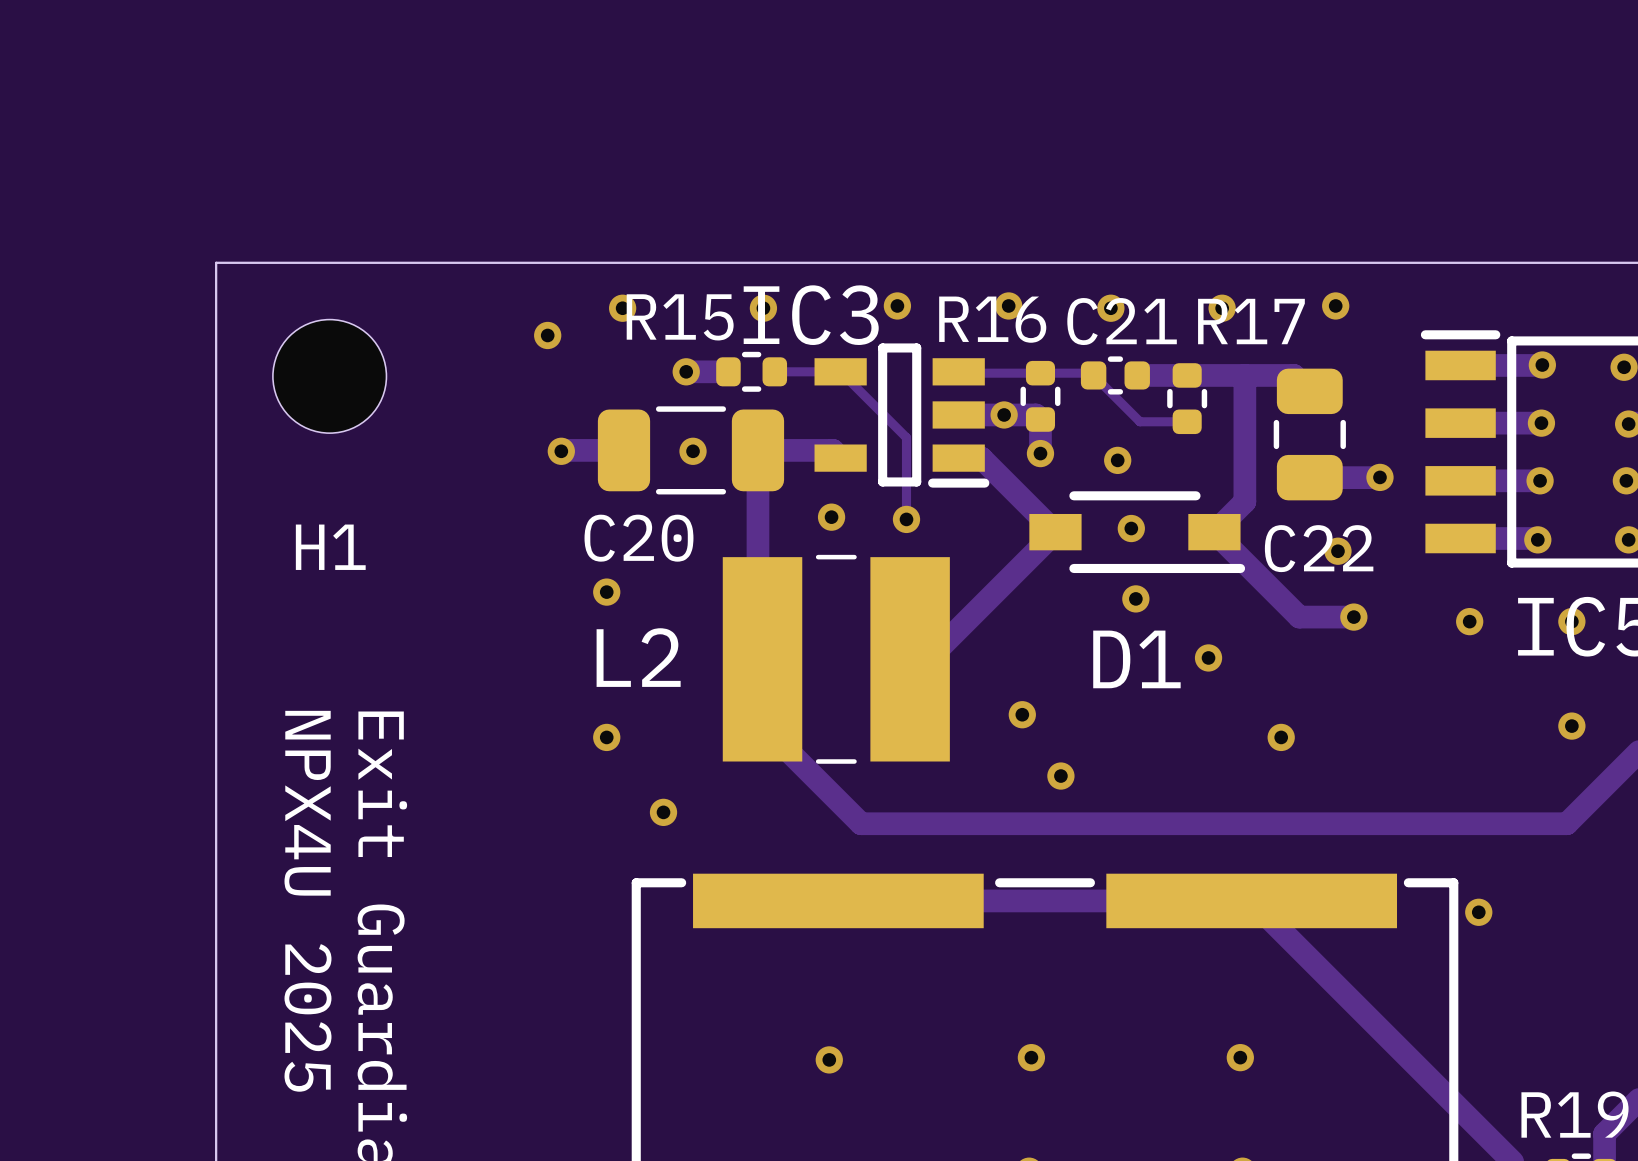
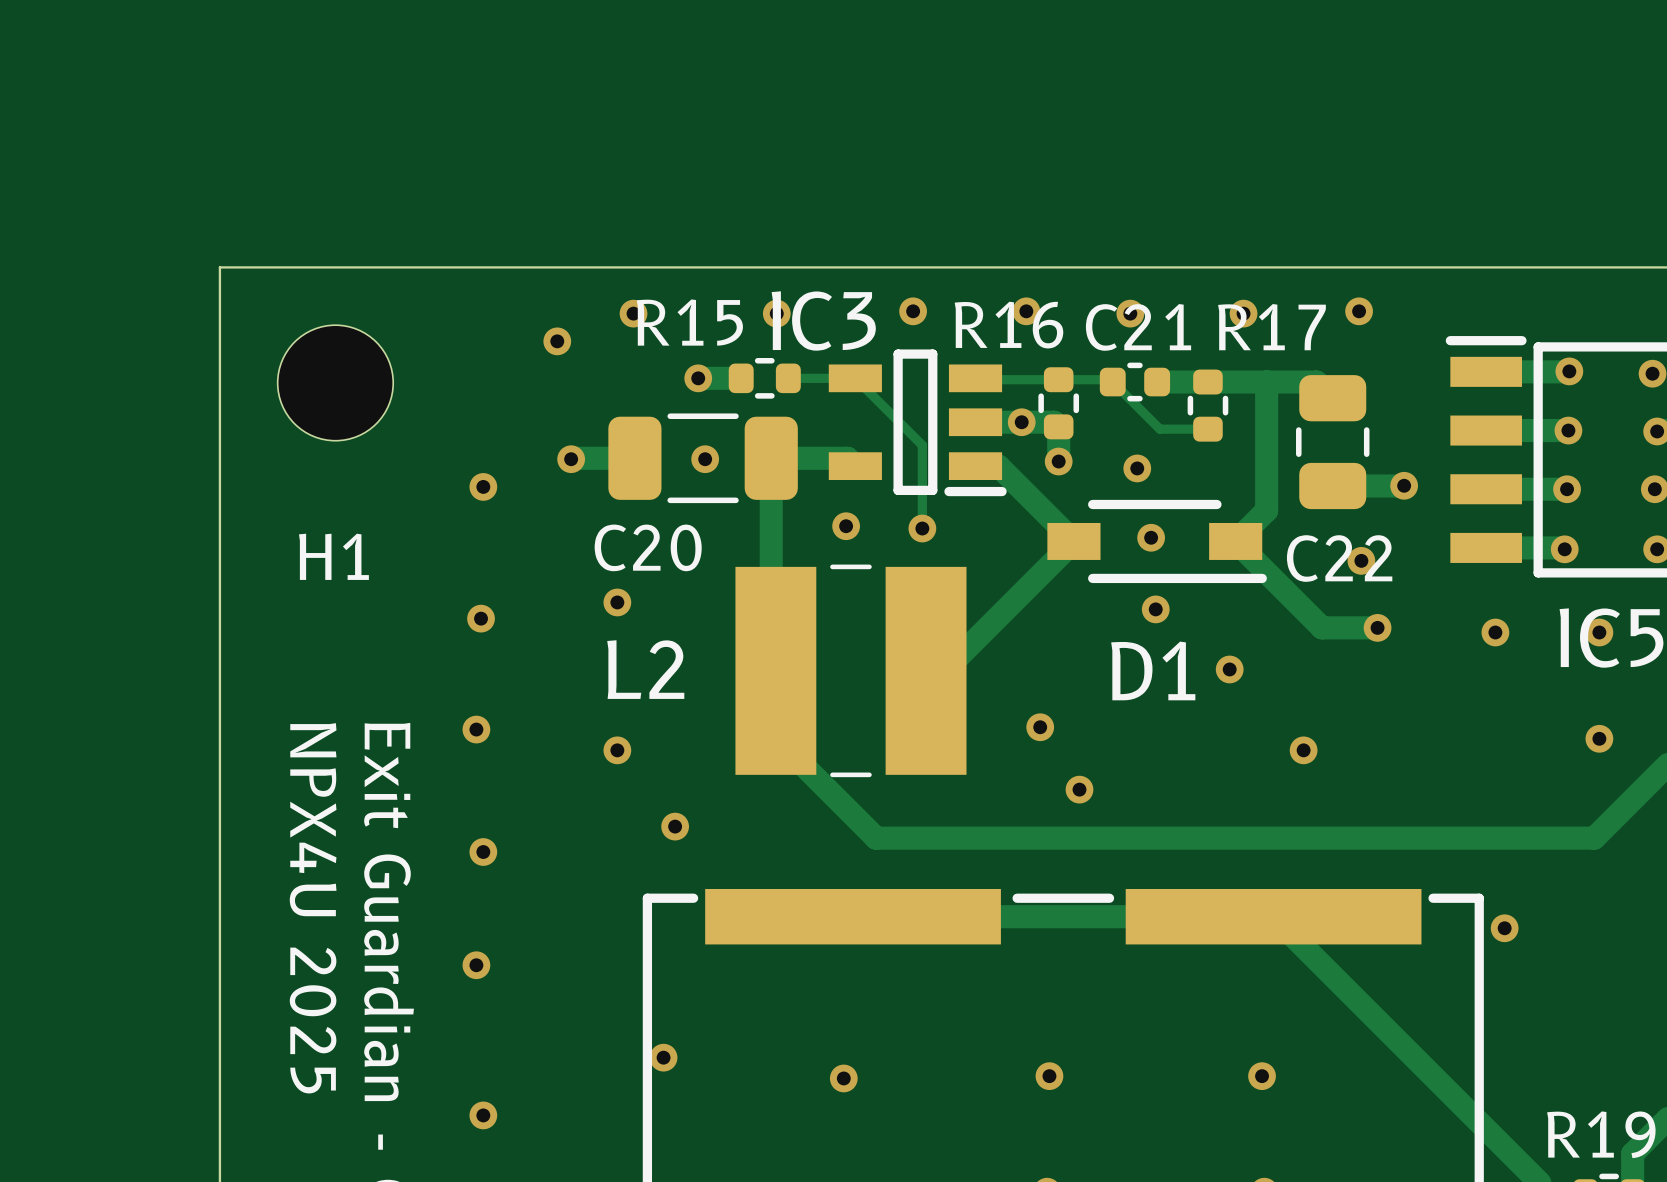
via: none -> (483, 486)
via: none -> (481, 618)
via: none -> (476, 729)
via: none -> (483, 852)
via: none -> (476, 965)
via: none -> (663, 1057)
via: none -> (483, 1115)

